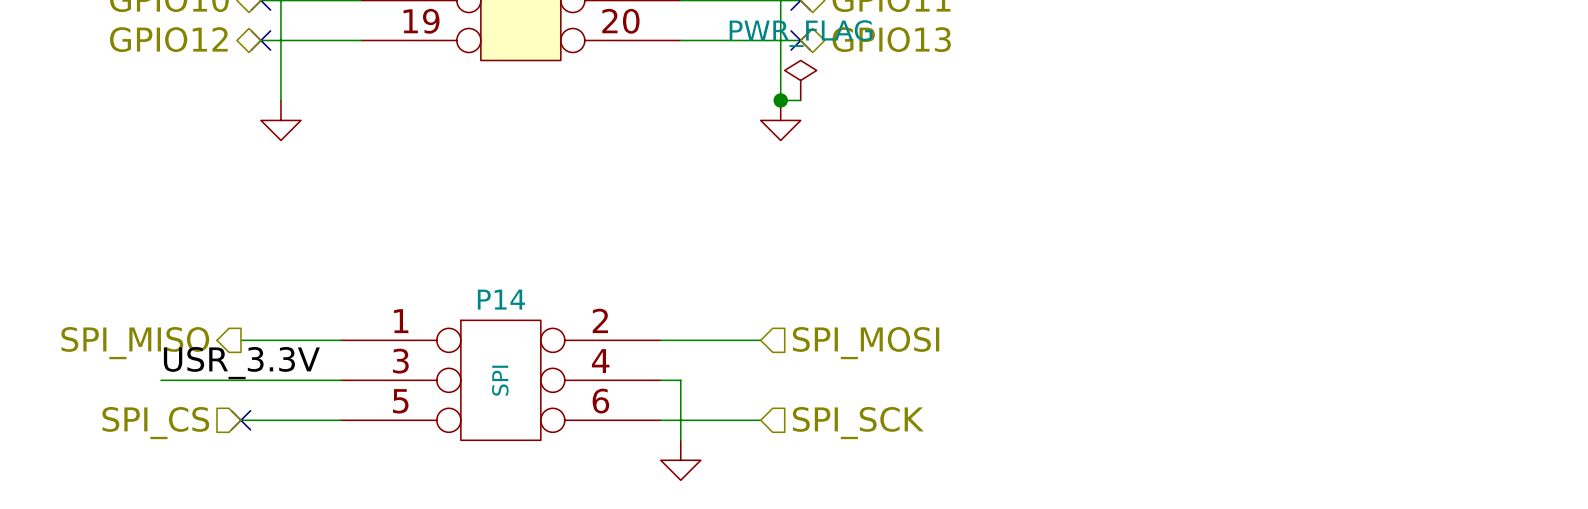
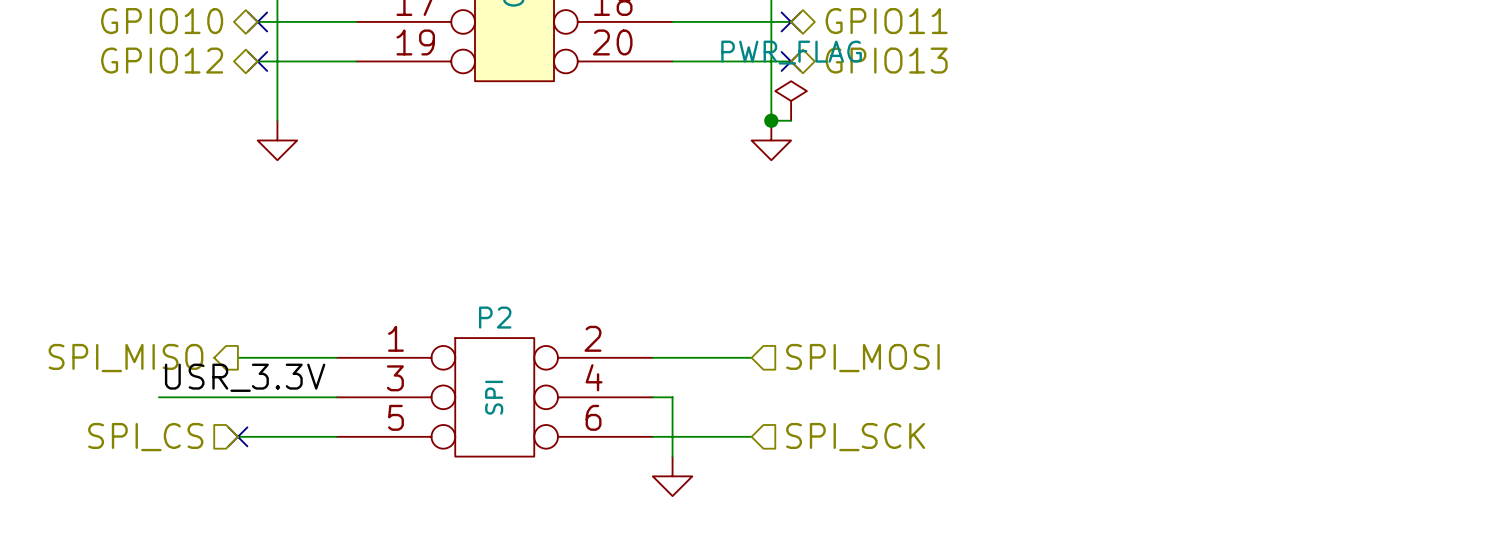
P14 name: P14 (501, 299) -> P2 (495, 317)

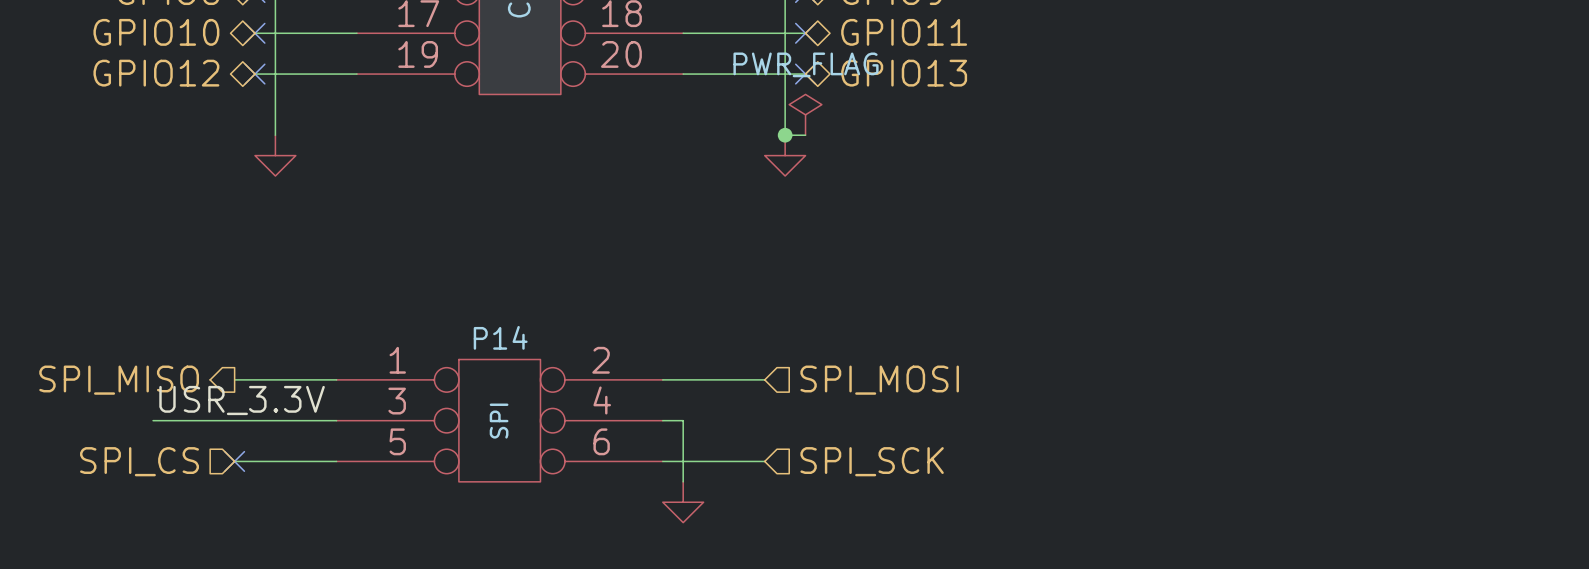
P2 name: P2 (495, 317) -> P14 (500, 337)

